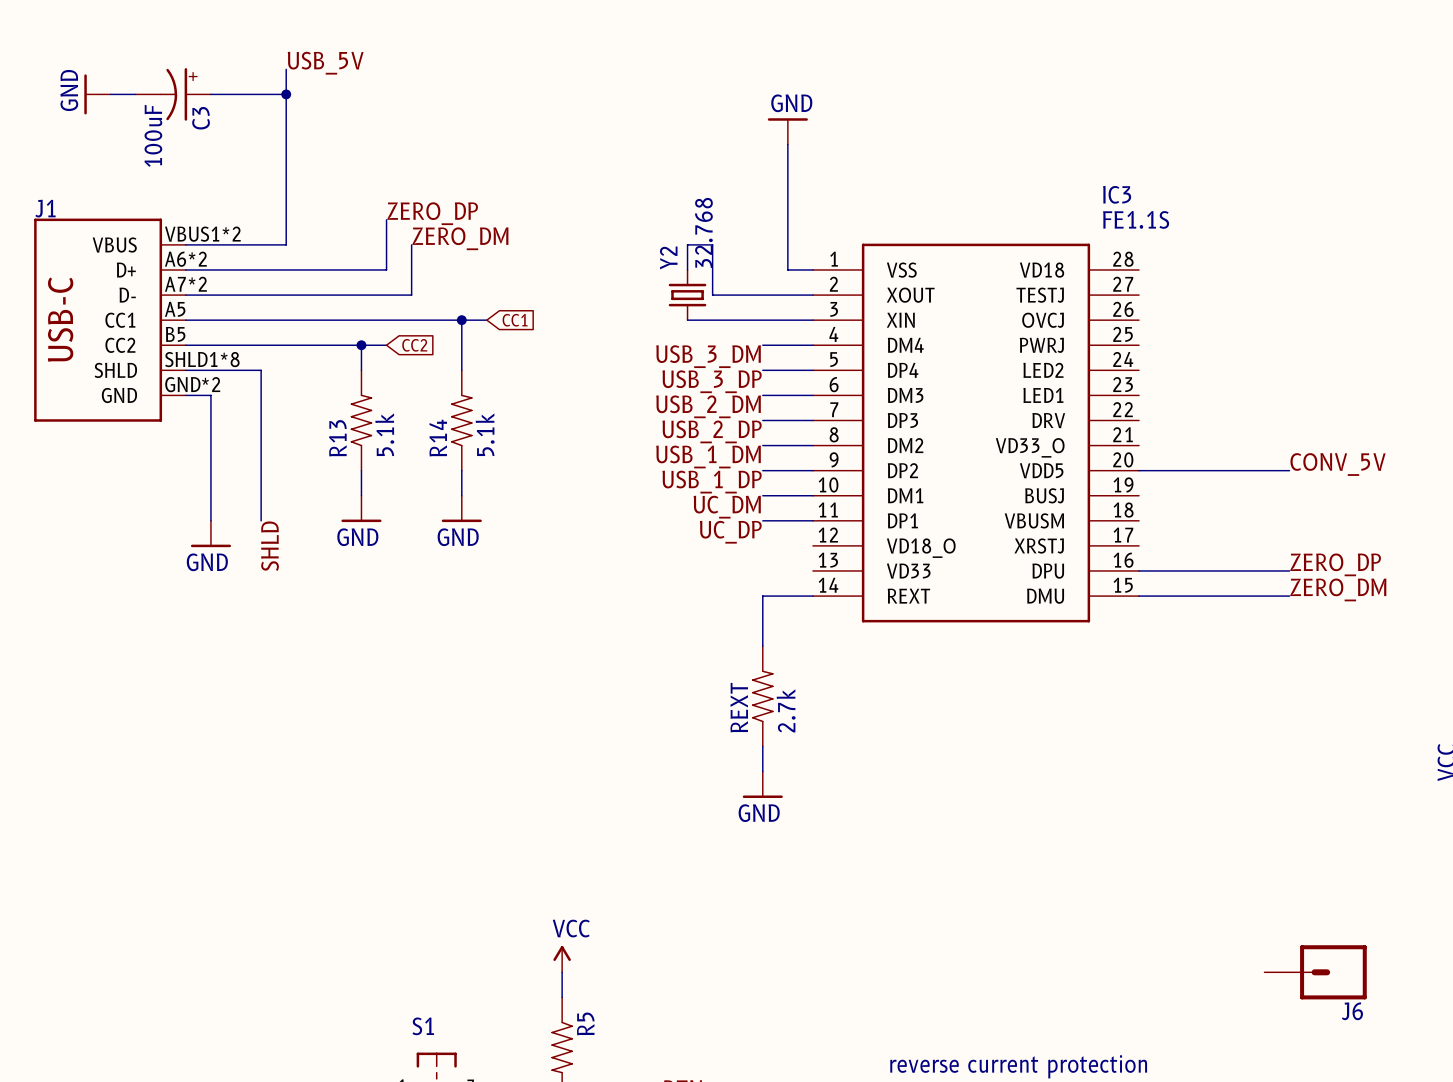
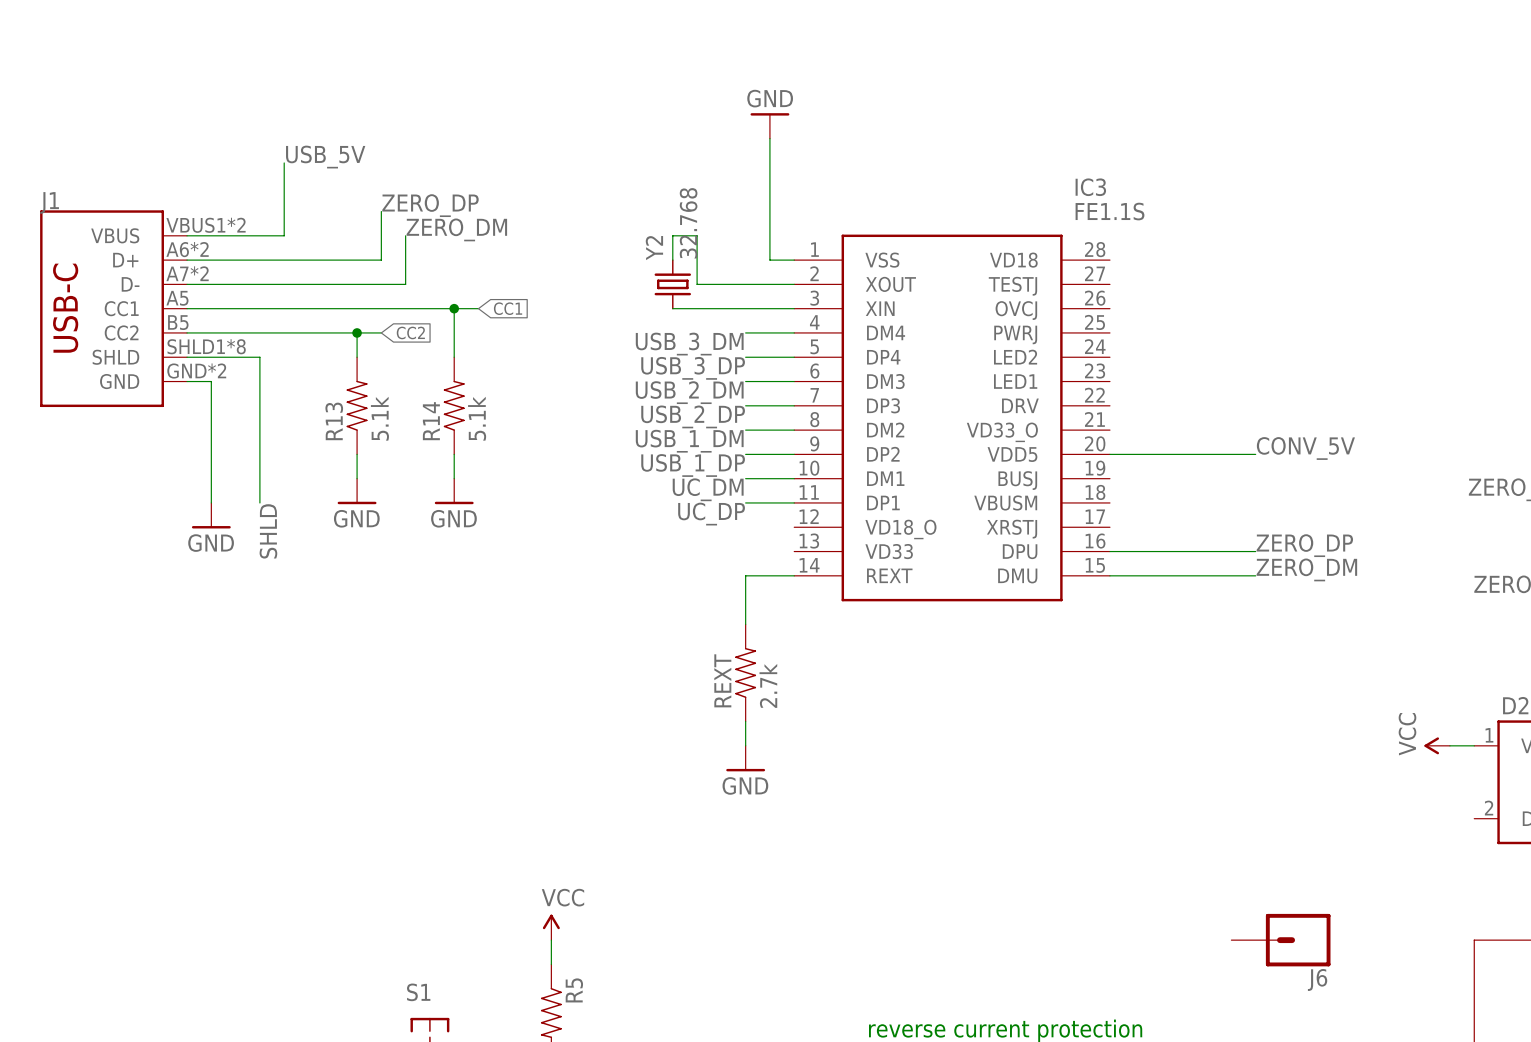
label position: USB_5V (325, 63) -> USB_5V (325, 157)
wire: (286, 69) (286, 169) -> none
power symbol: GND (97, 94) -> none
wire: (110, 94) (135, 94) -> none
C3: 100uF (173, 94) -> none
wire: (210, 94) (286, 94) -> none
junction: (286, 94) -> none

